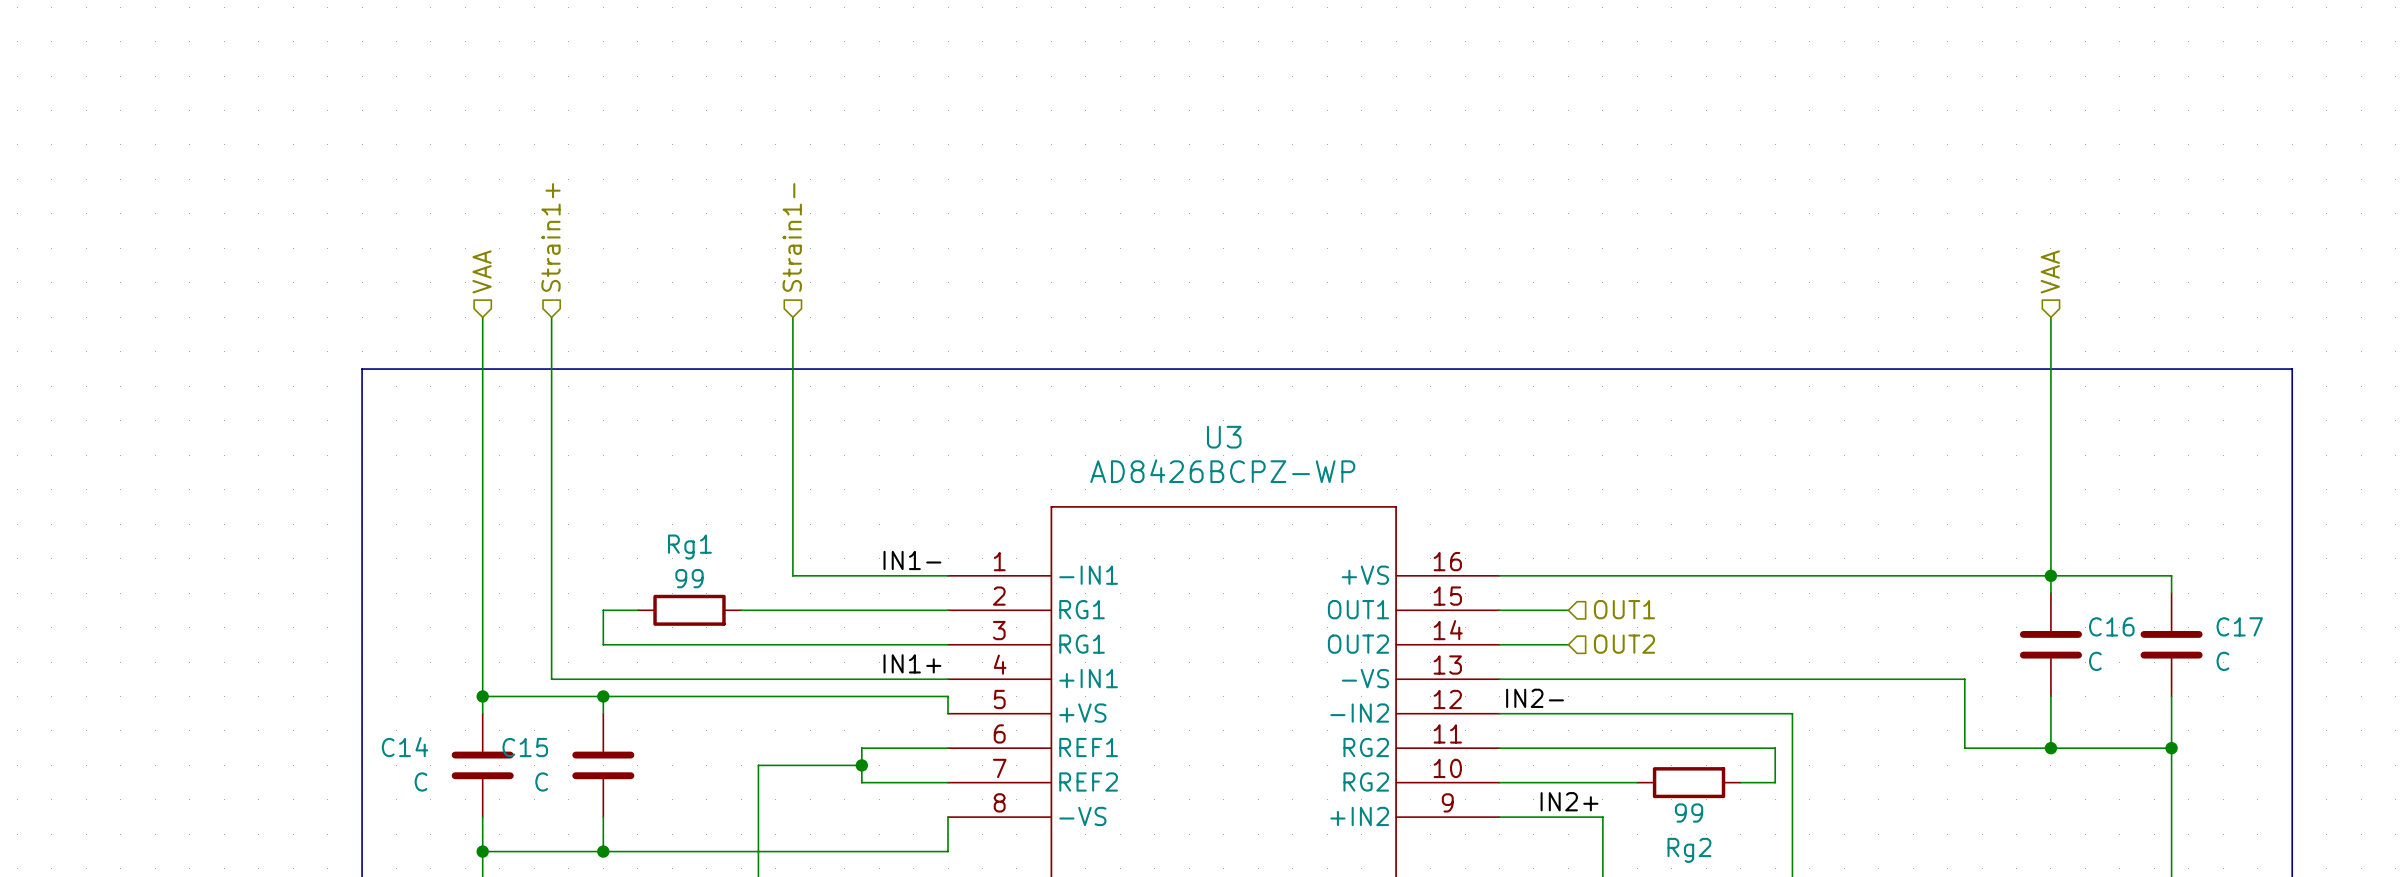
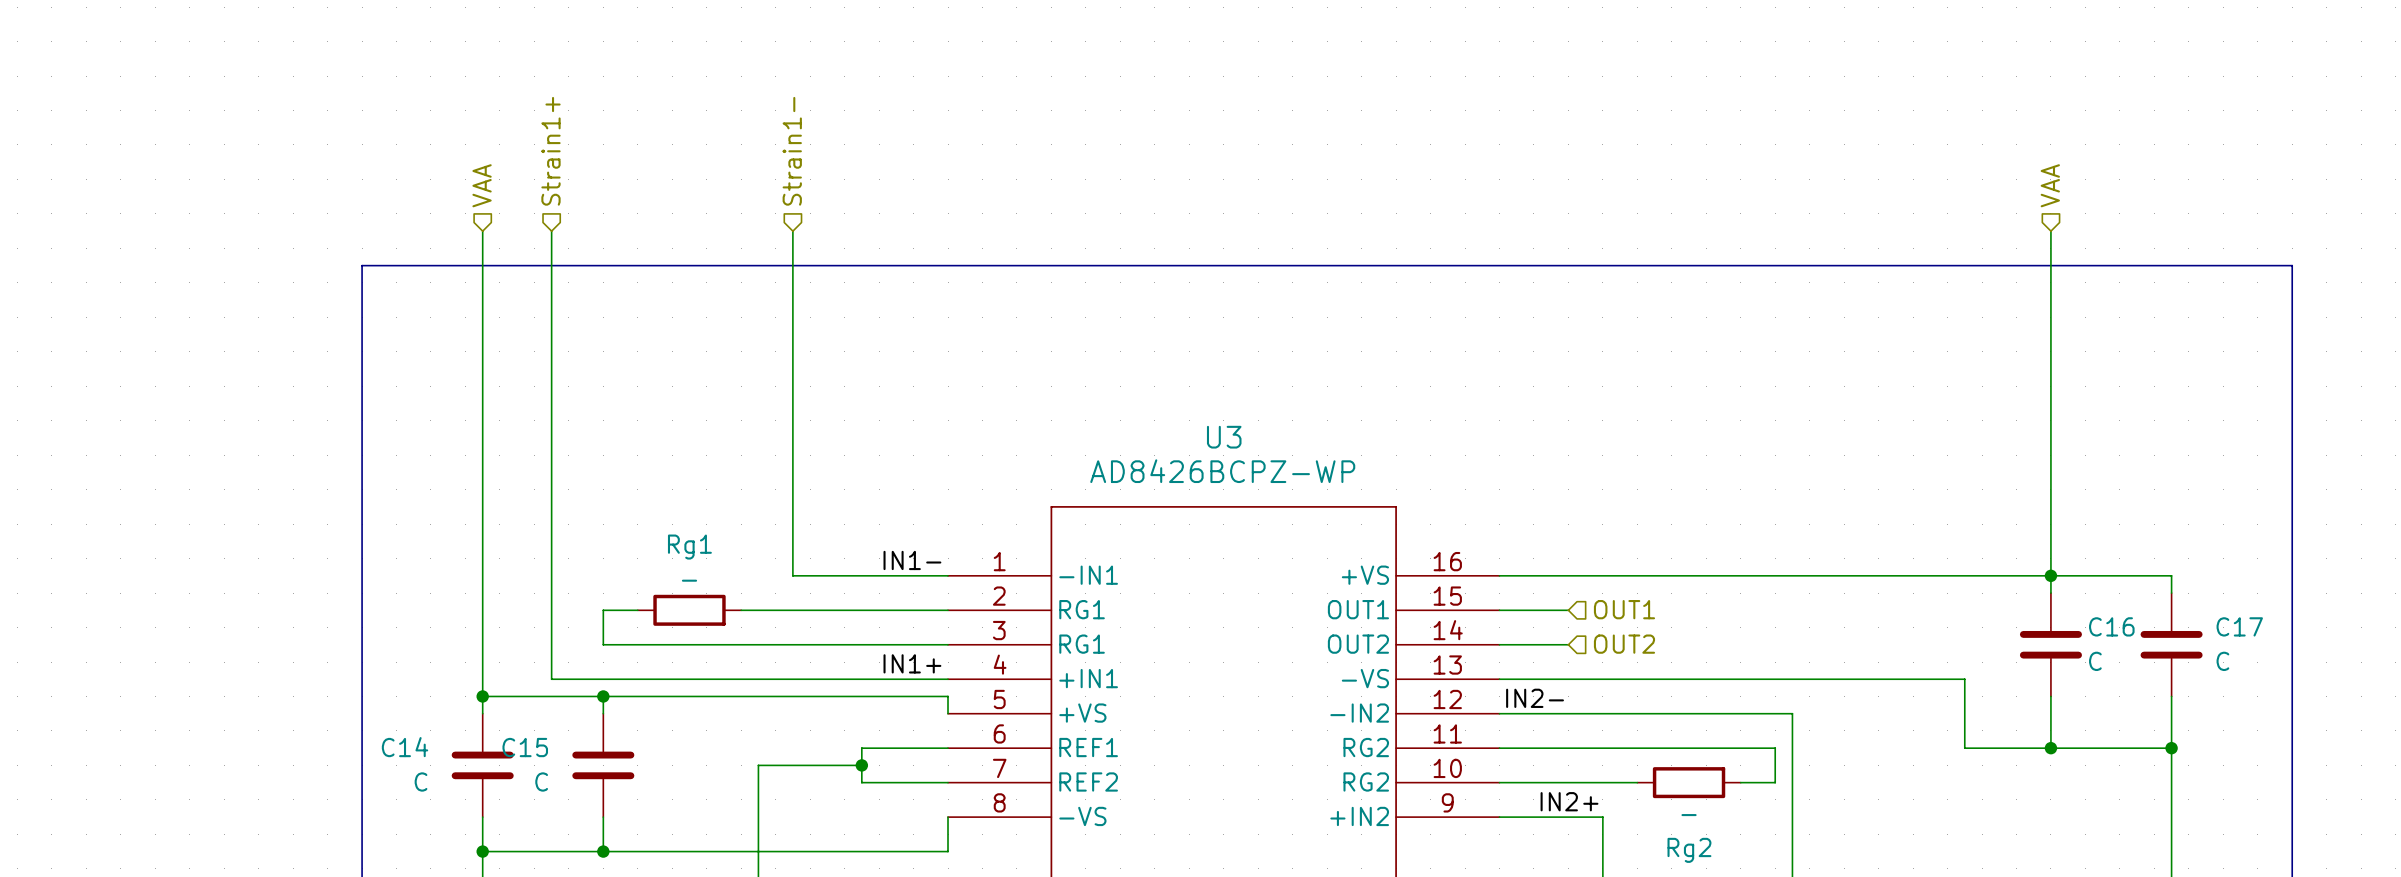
wire: none -> (482, 231) (482, 317)
wire: none -> (551, 231) (551, 317)
wire: none -> (792, 231) (792, 317)
wire: none -> (2050, 231) (2050, 317)
hierarchical label position: Strain1+ (550, 237) -> Strain1+ (550, 151)
hierarchical label position: Strain1- (792, 237) -> Strain1- (792, 151)
hierarchical label position: VAA (482, 271) -> VAA (482, 185)
hierarchical label position: VAA (2050, 271) -> VAA (2050, 185)
line: (362, 369) (2292, 369) -> (362, 369) (362, 265) (2292, 265) (2292, 369)
Rg1 value: 99 (689, 578) -> - (689, 580)
Rg2 value: 99 (1689, 813) -> - (1689, 815)

